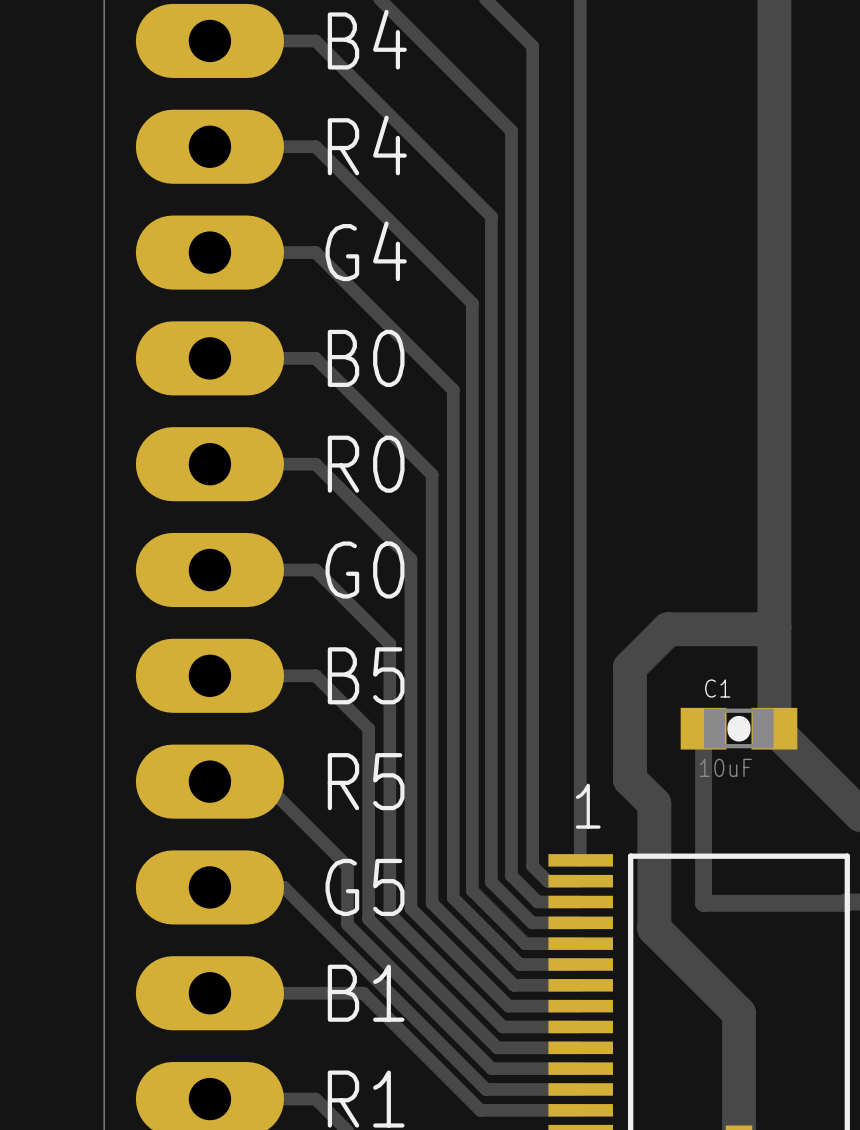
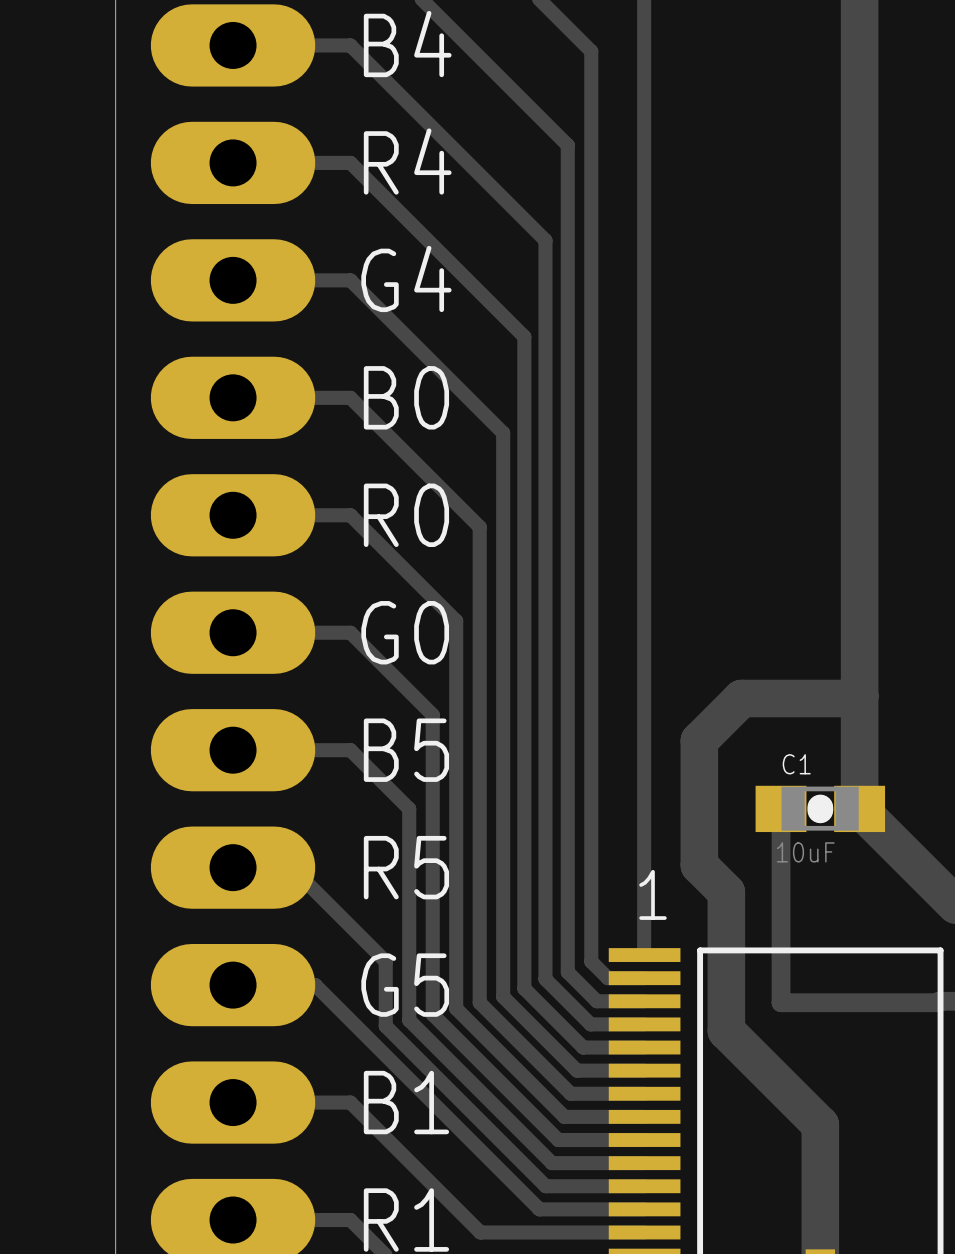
track: (315, 993) (363, 993) (480, 1110) -> (350, 1102) (480, 1232) (533, 1232)

